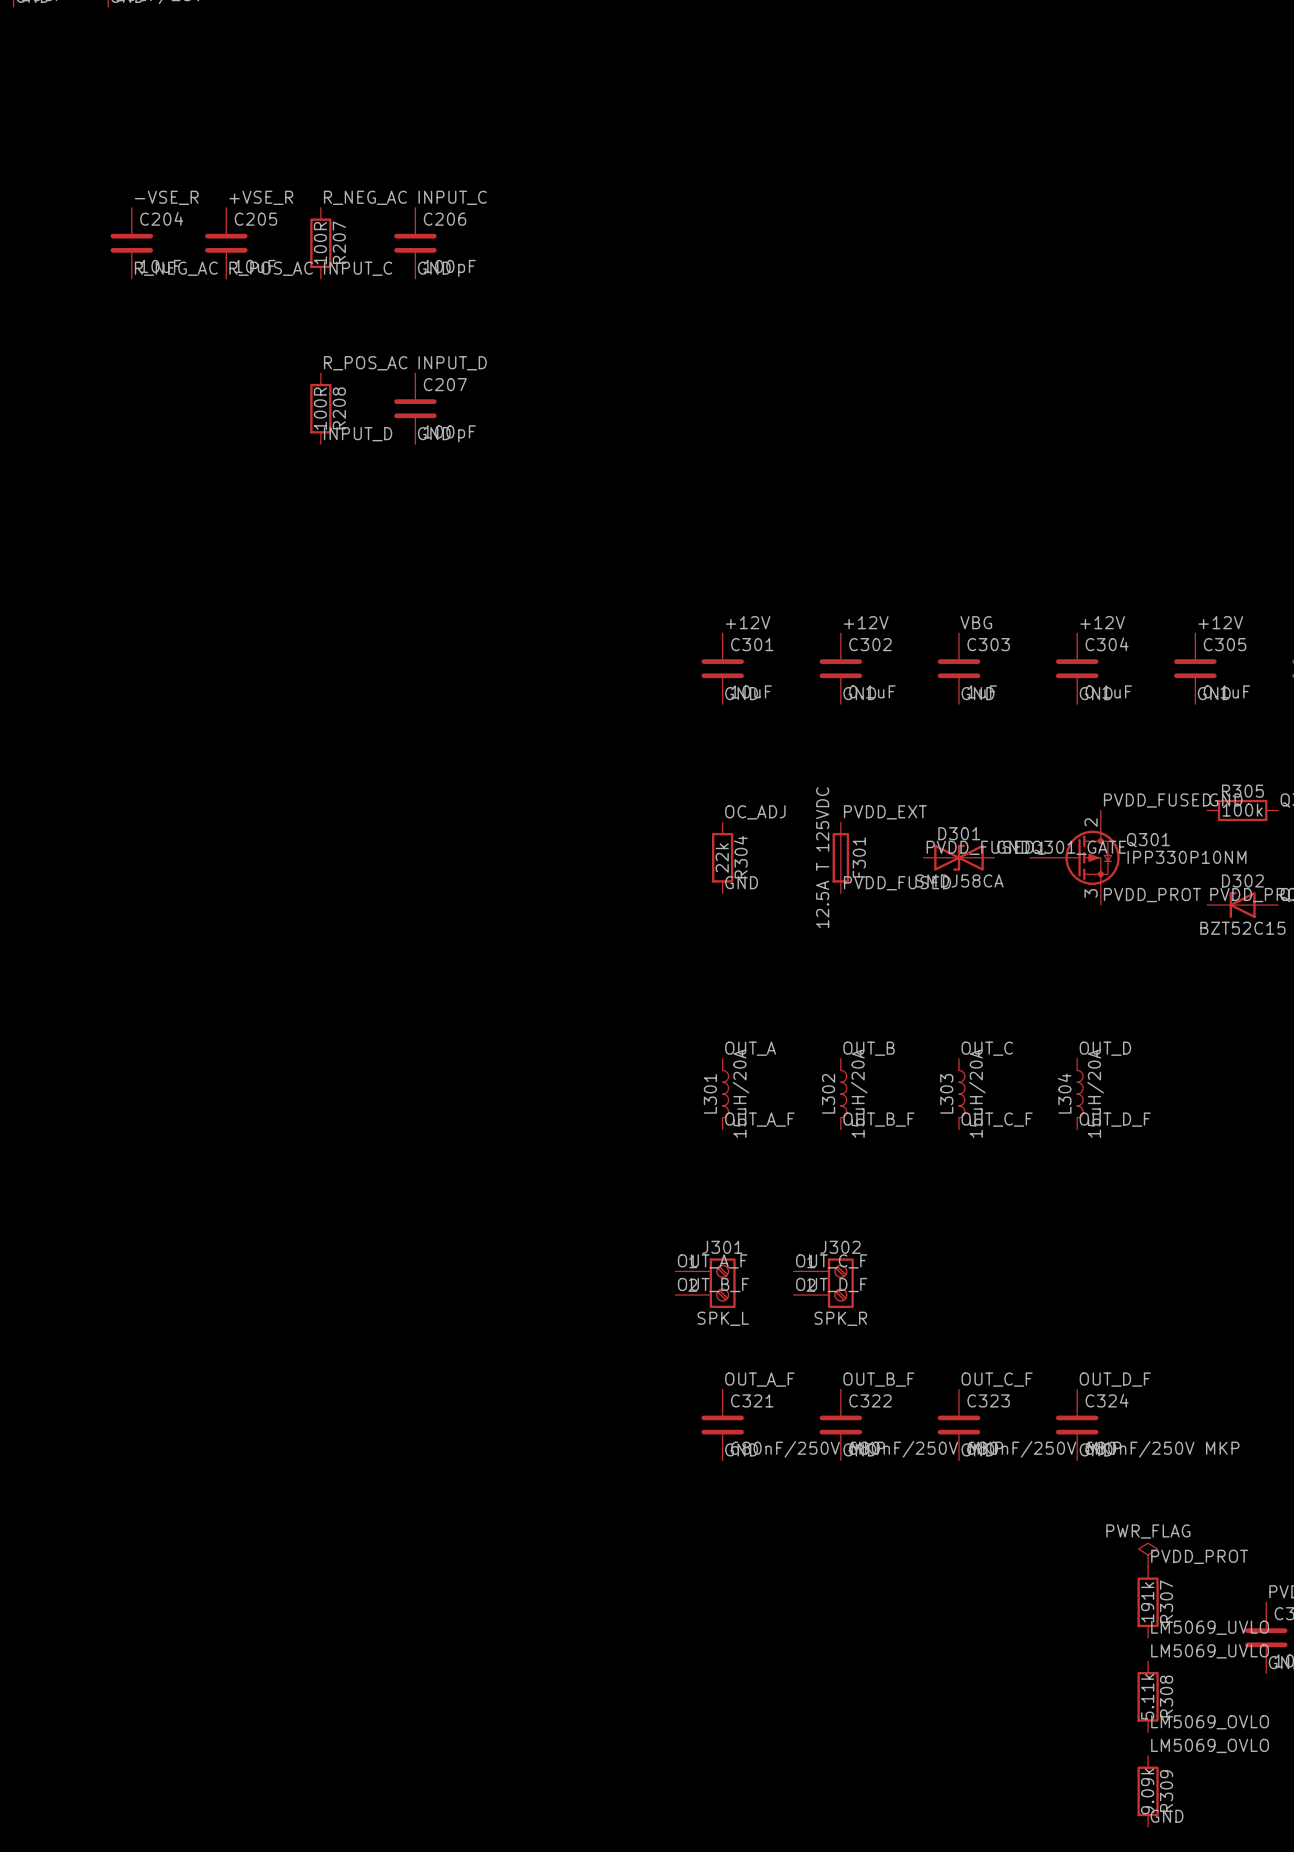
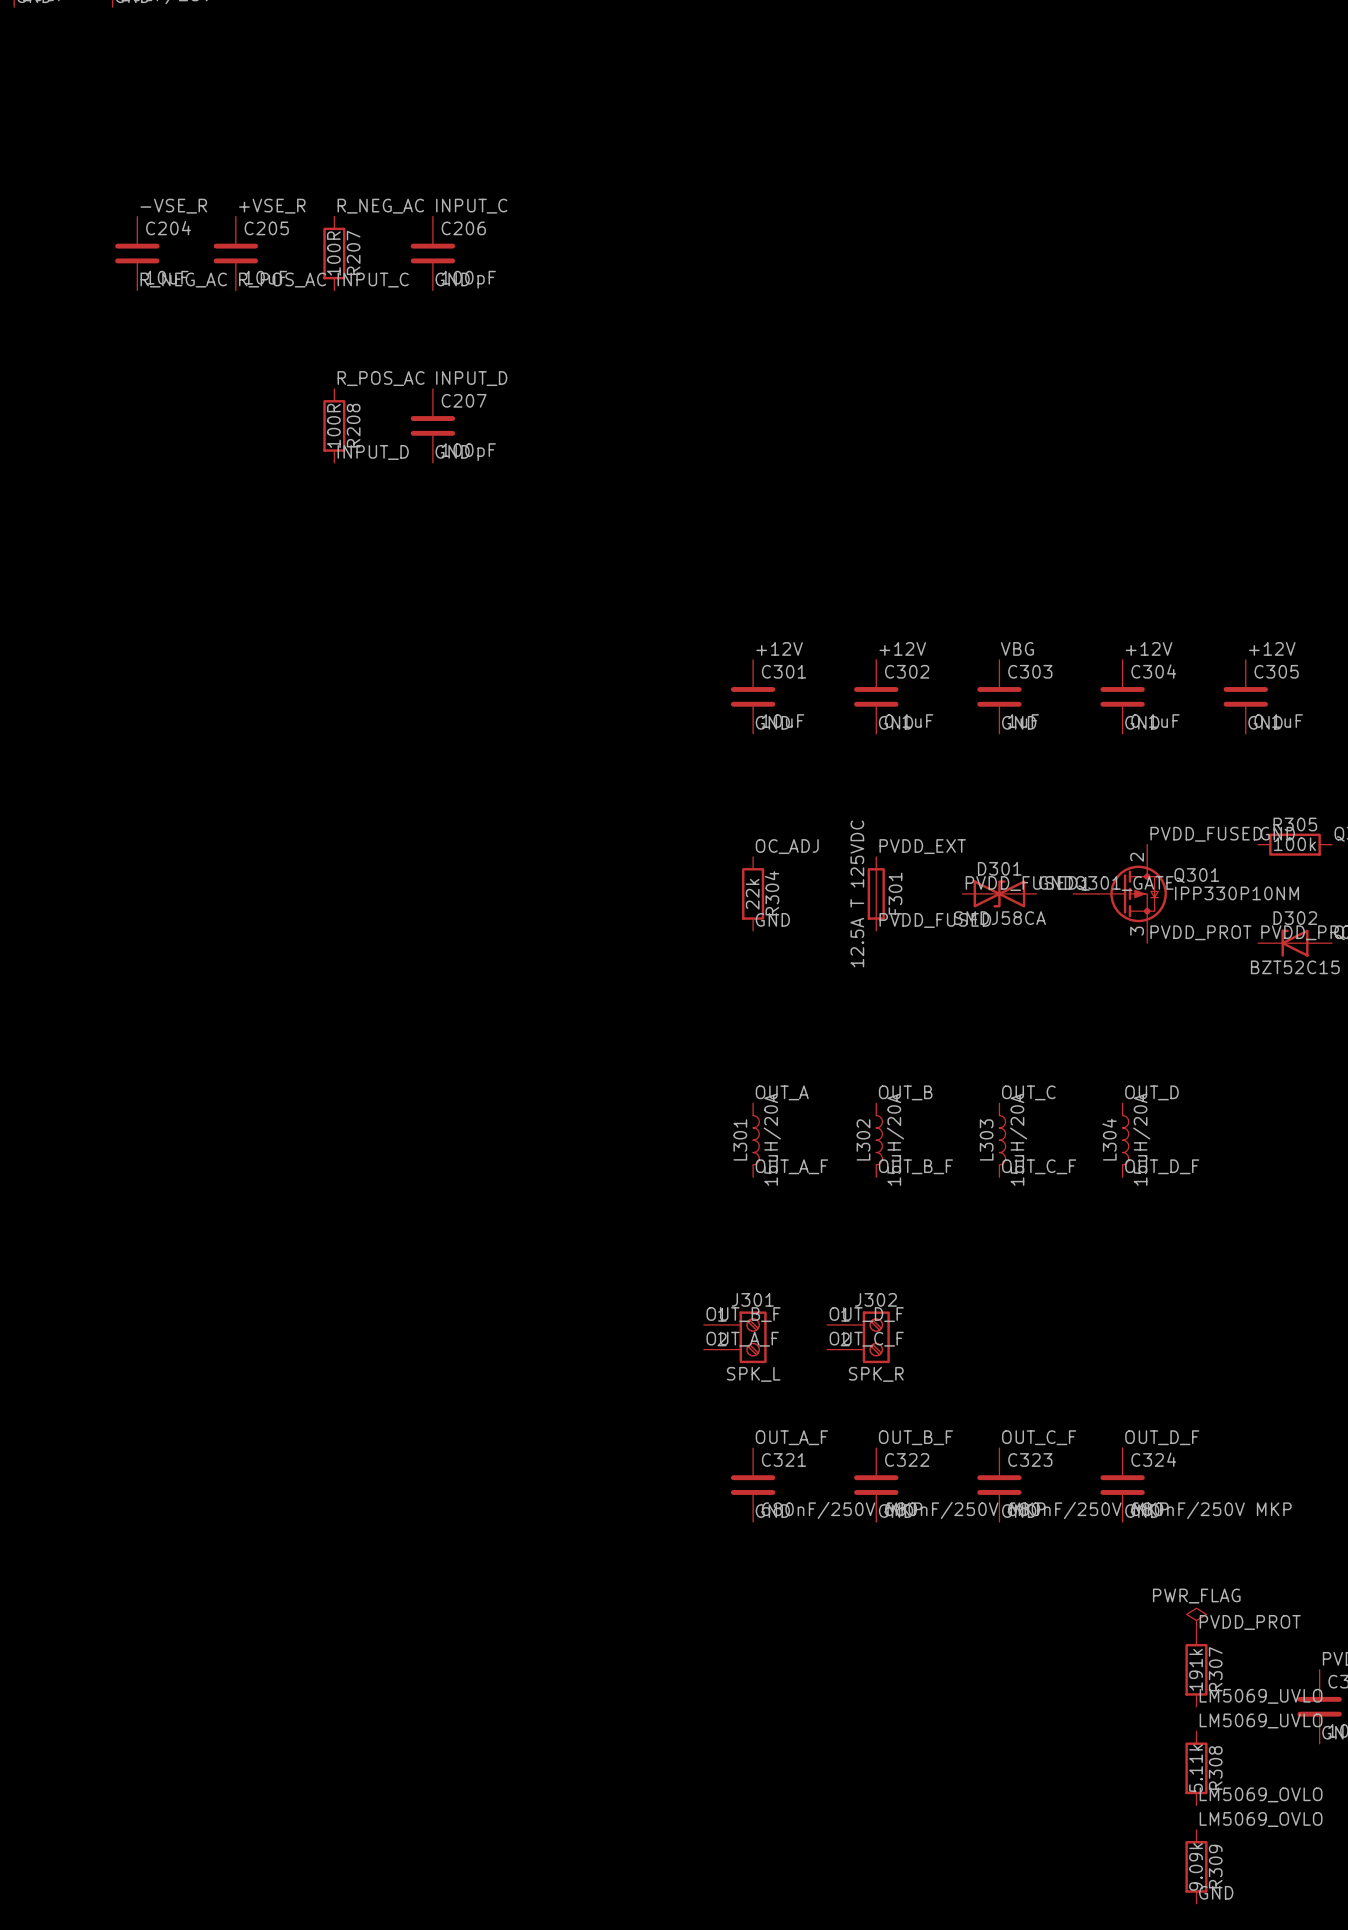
label: OUT_A_F (712, 1261) -> OUT_B_F (743, 1314)
label: OUT_C_F (831, 1261) -> OUT_D_F (866, 1314)
label: OUT_B_F (713, 1285) -> OUT_A_F (742, 1339)
label: OUT_D_F (831, 1285) -> OUT_C_F (866, 1339)

